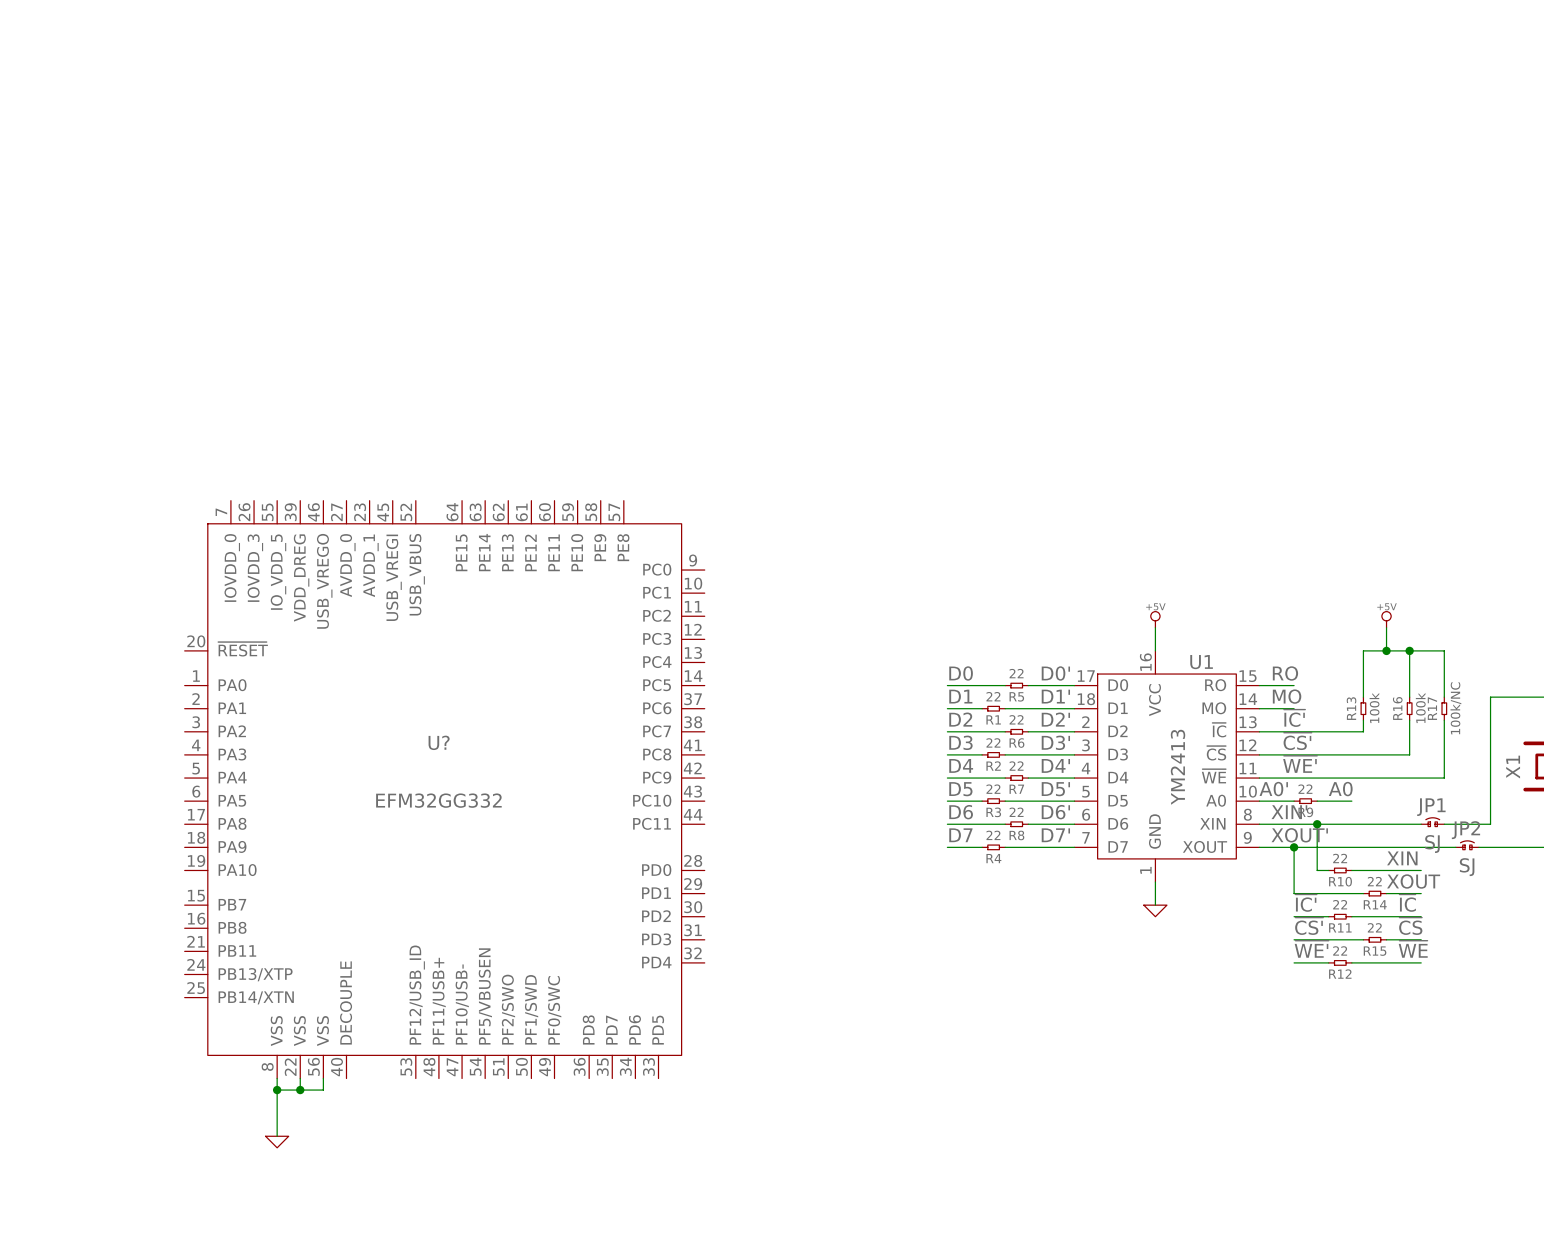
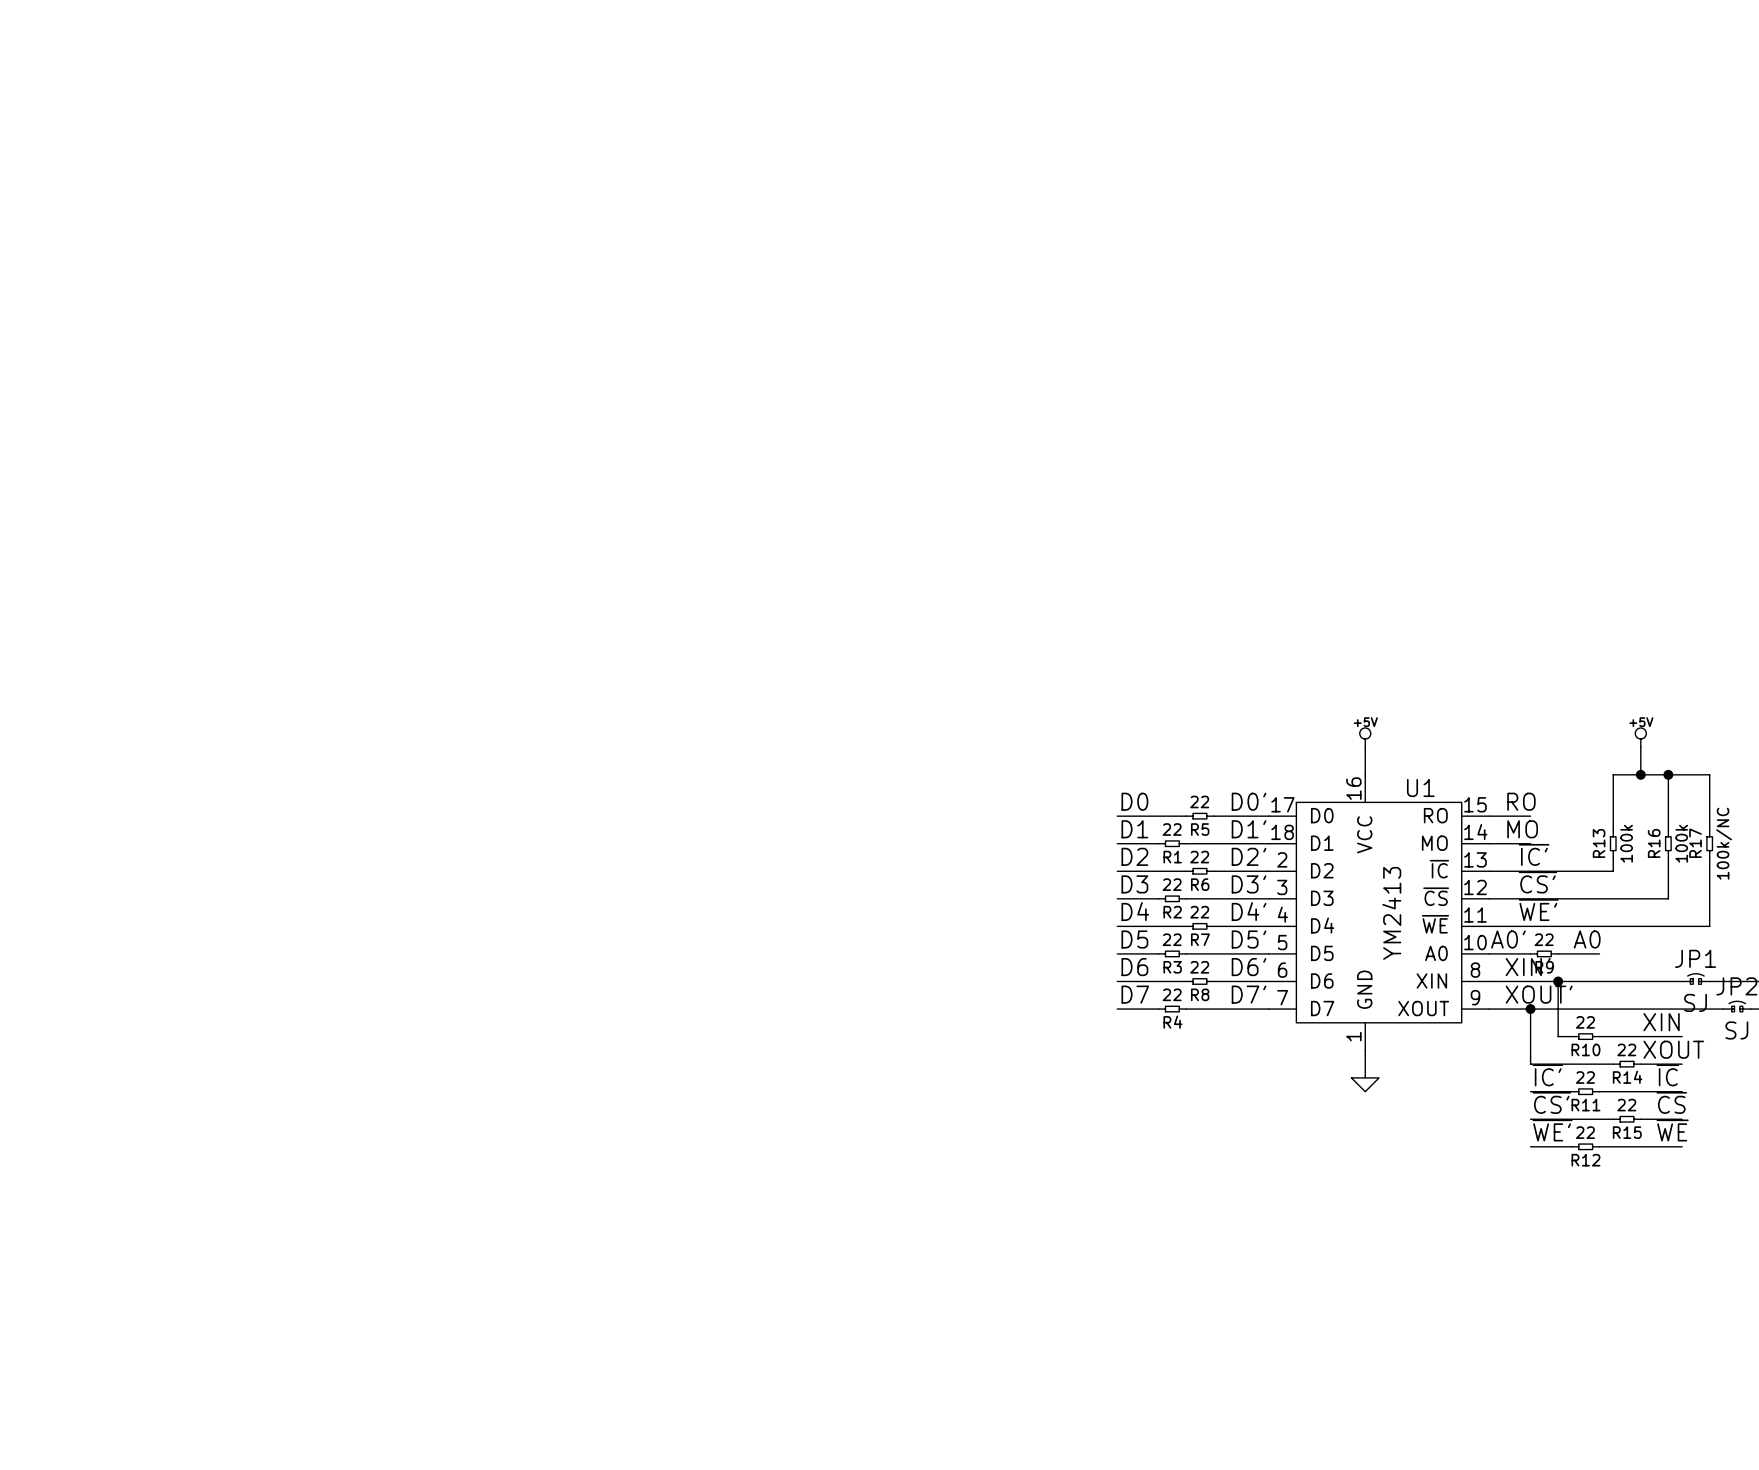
U?: EFM32GG332 (444, 789) -> none
wire: (277, 1078) (277, 1136) -> none
wire: (300, 1078) (300, 1090) -> none
wire: (323, 1078) (323, 1090) (277, 1090) -> none
junction: (277, 1090) -> none
junction: (300, 1090) -> none
power symbol: (277, 1142) -> none

